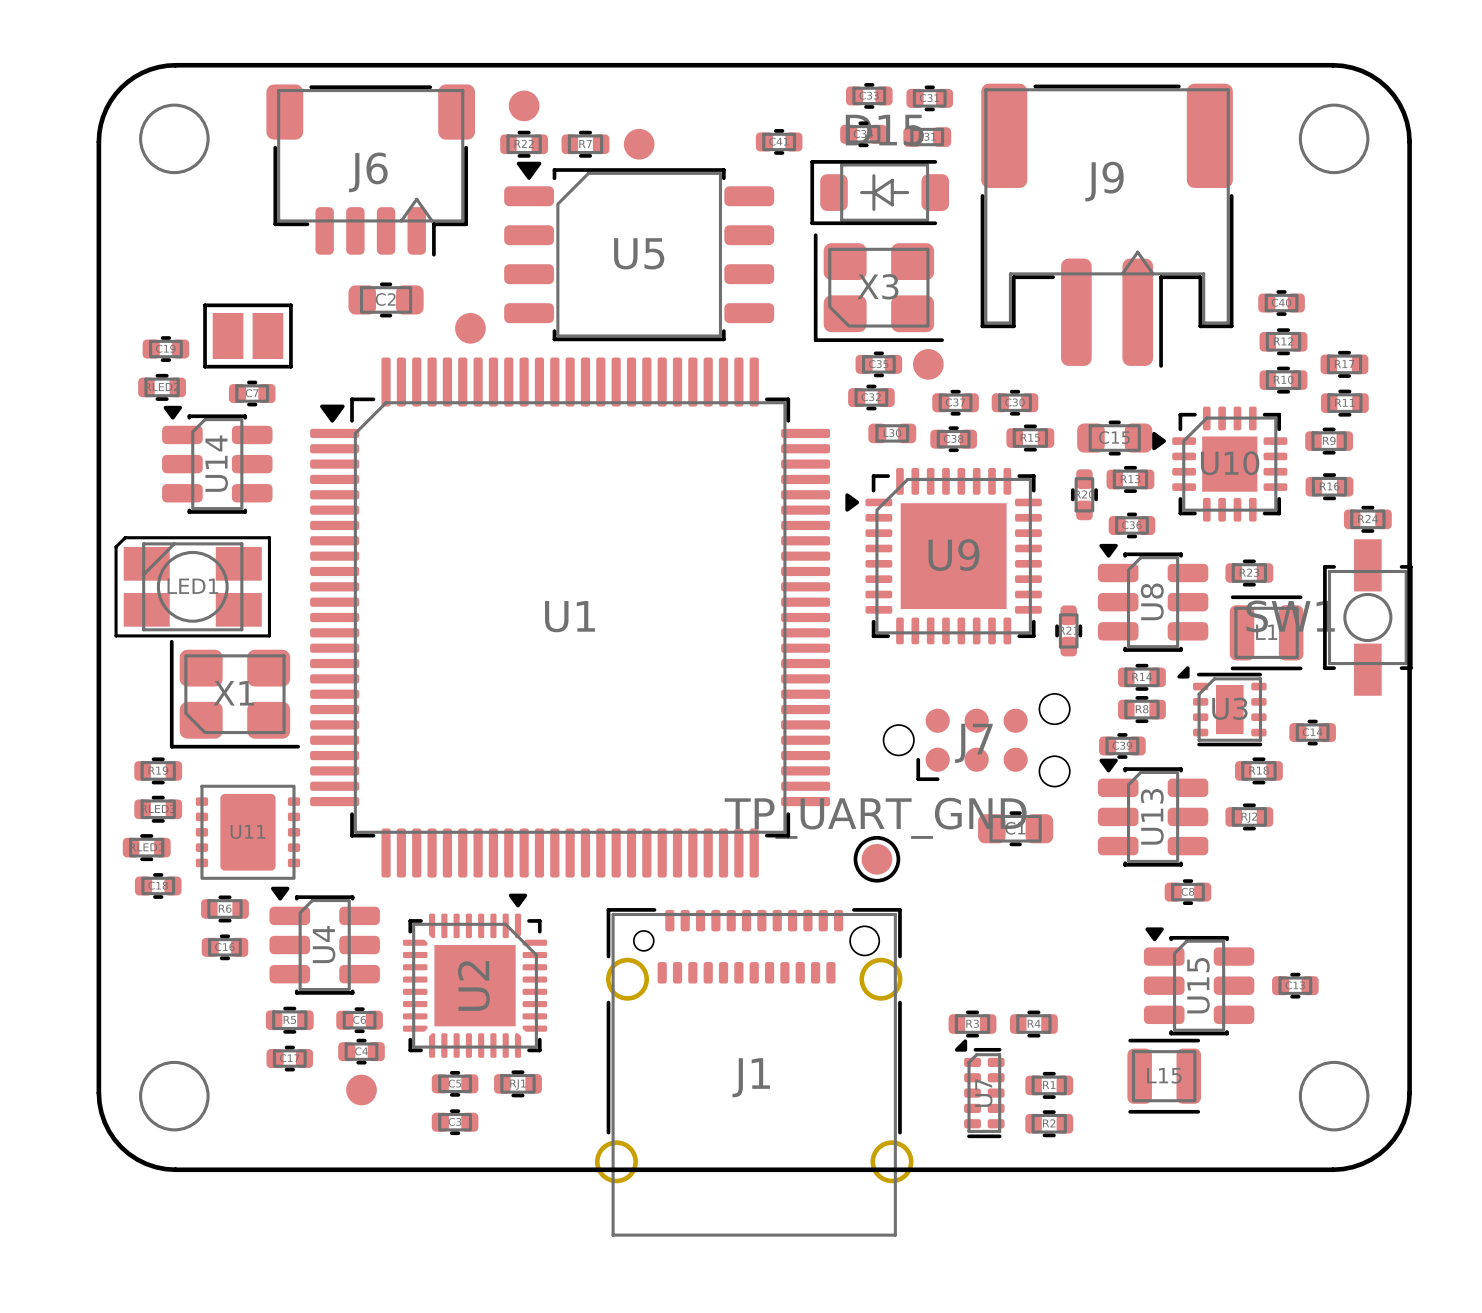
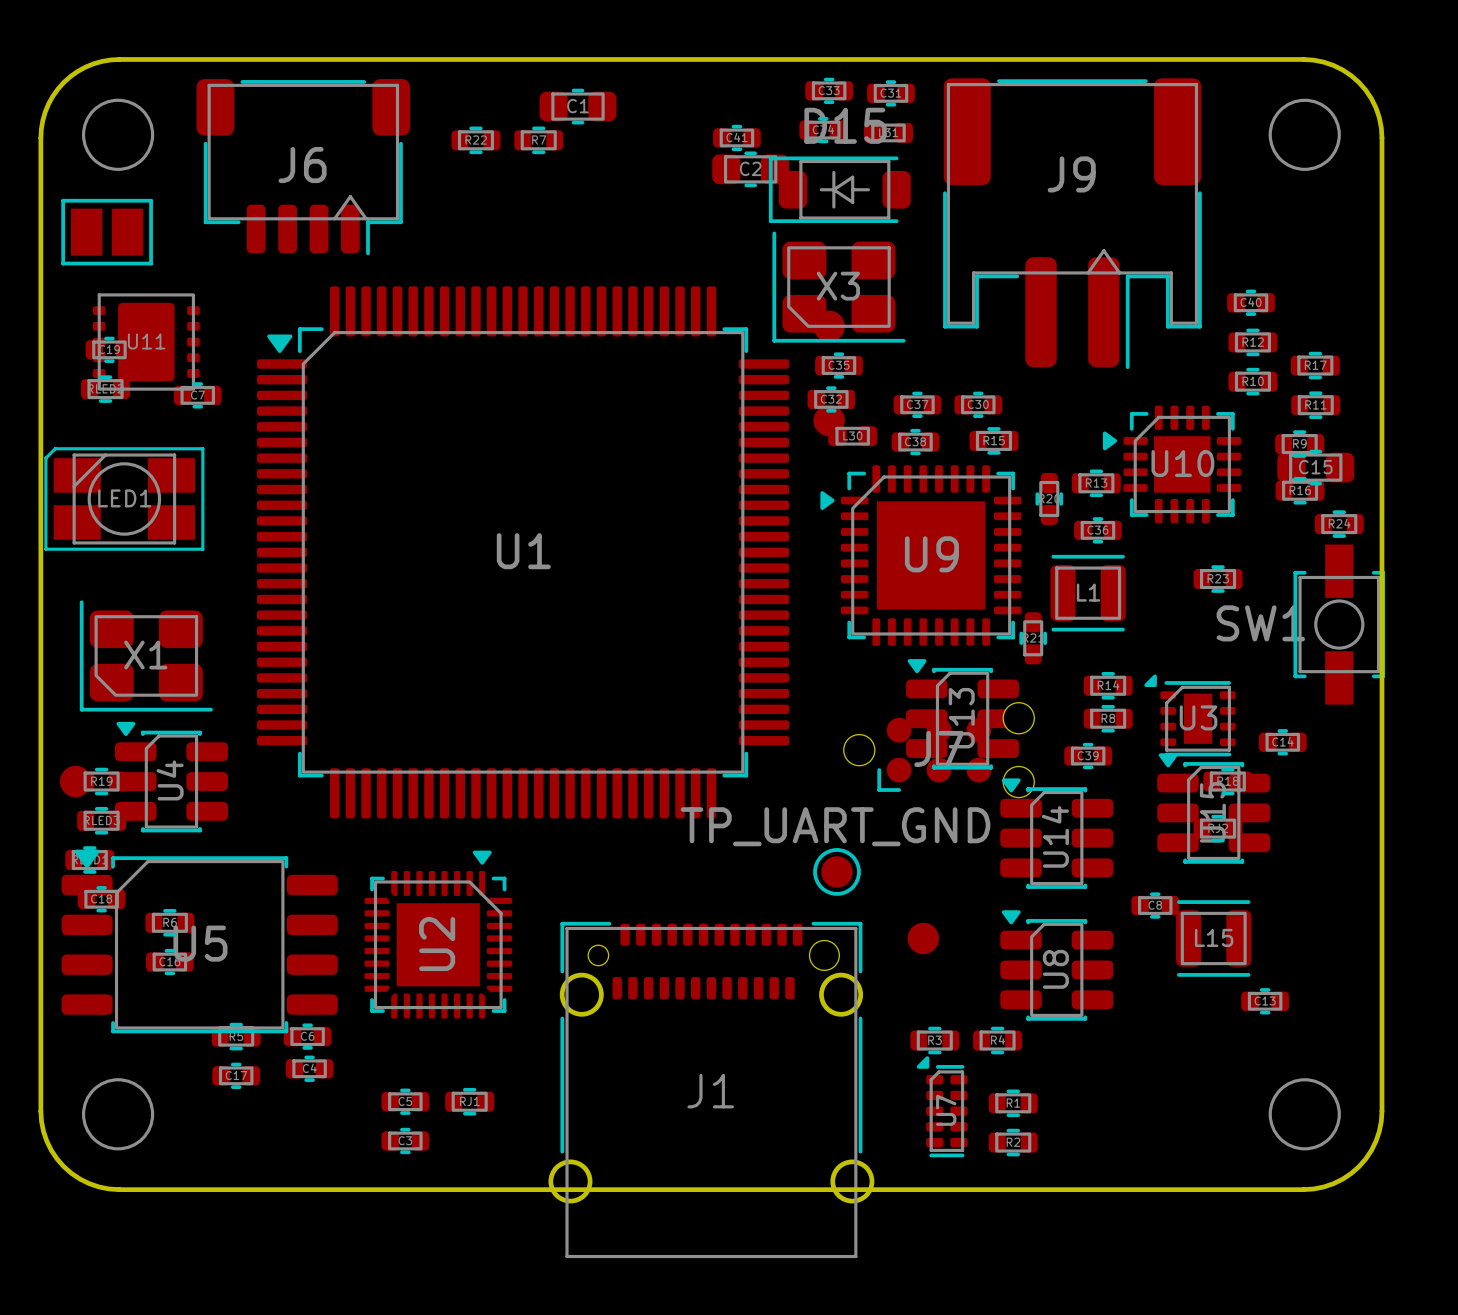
part: (524, 105) -> none
part: (639, 144) -> none
J6 position: (370, 170) -> (303, 167)
U5 position: (639, 251) -> (199, 941)
C2 position: (386, 299) -> (750, 169)
part: none -> (829, 326)
part: (470, 328) -> none
part position: (247, 336) -> (107, 232)
part: (928, 364) -> none
part: none -> (829, 420)
C15 position: (1114, 438) -> (1315, 467)
U14 position: (217, 459) -> (1056, 833)
U10 position: (1219, 464) -> (1172, 464)
U9 position: (943, 556) -> (920, 555)
LED1 position: (192, 586) -> (124, 498)
U8 position: (1153, 597) -> (1056, 965)
U1 position: (570, 617) -> (523, 552)
L1 position: (1266, 632) -> (1088, 593)
X1 position: (234, 694) -> (146, 655)
part: none -> (75, 781)
U13 position: (1153, 812) -> (962, 714)
C1 position: (1015, 828) -> (578, 106)
U11 position: (247, 832) -> (146, 342)
part: none -> (923, 938)
U4 position: (324, 940) -> (171, 777)
U2 position: (475, 975) -> (438, 934)
U15 position: (1199, 981) -> (1213, 808)
L15 position: (1164, 1076) -> (1213, 938)
part: (361, 1090) -> none

